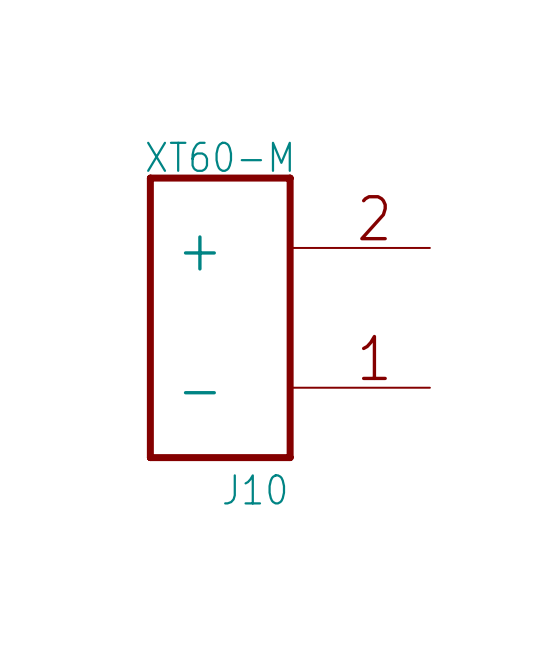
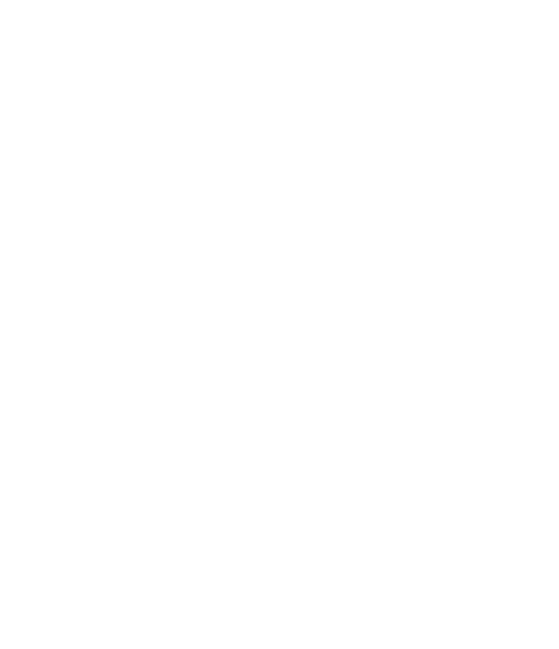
J10: XT60-M (288, 317) -> none

